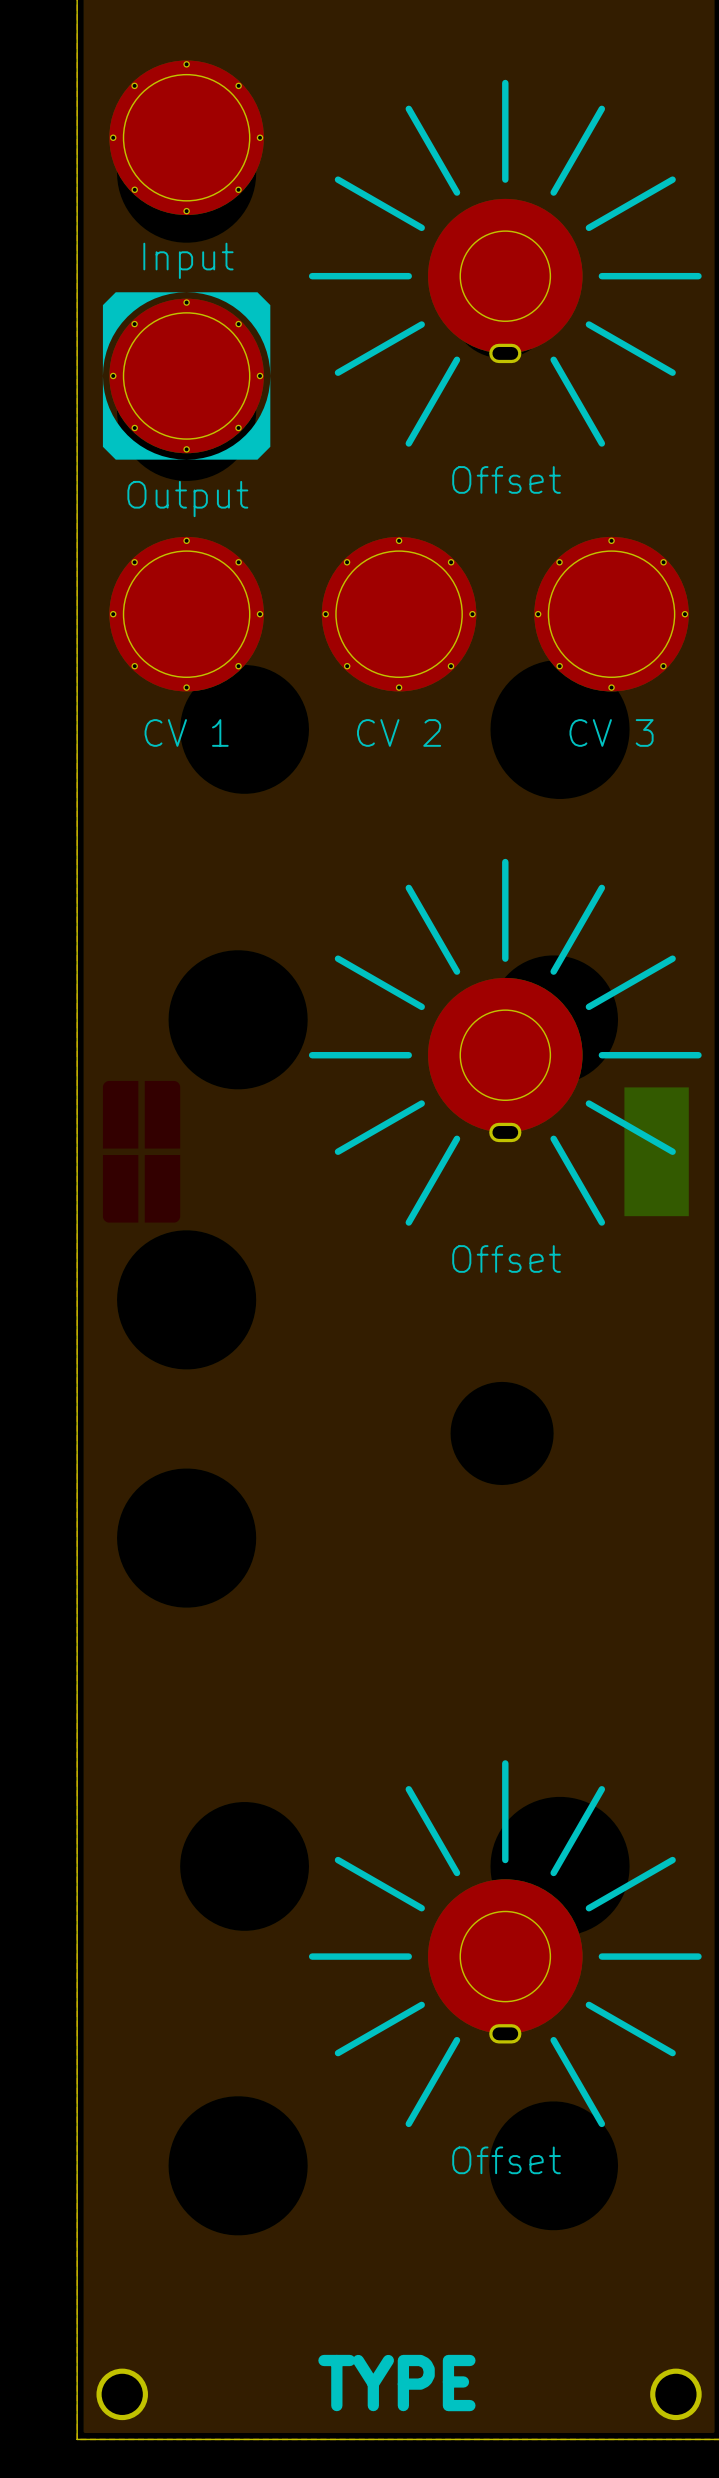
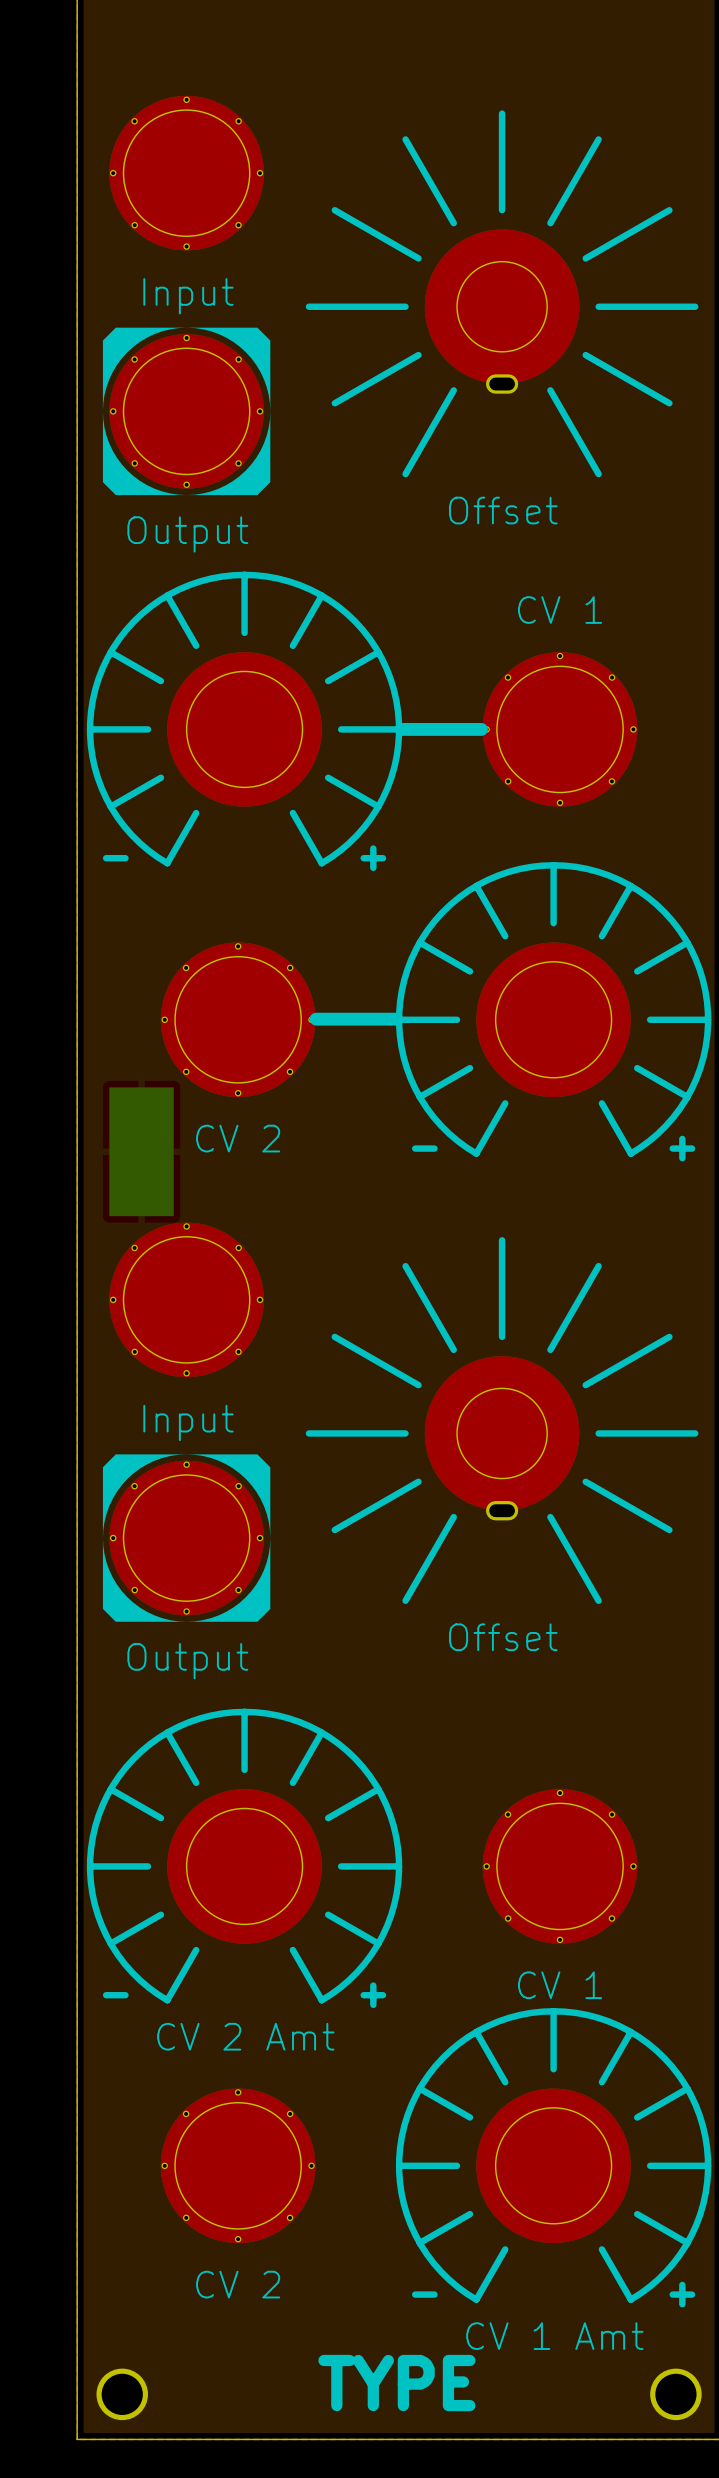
part position: (186, 137) -> (186, 173)
part position: (505, 263) -> (502, 293)
part position: (186, 375) -> (186, 411)
part: CV 1 (186, 614) -> none
part: CV 2 (399, 614) -> none
part: CV 3 (611, 614) -> none
part: none -> (244, 721)
line: none -> (402, 729) (481, 729)
part: none -> CV 1 (560, 729)
part: none -> (553, 1011)
part: none -> CV 2 (238, 1019)
line: none -> (316, 1019) (395, 1019)
part: Offset (505, 1042) -> none
part: none -> (141, 1151)
part: (656, 1151) -> none
part: none -> Input (186, 1299)
part: none -> Offset (502, 1420)
part: none -> Output (186, 1538)
part: none -> CV 2 Amt (244, 1858)
part: none -> CV 1 (560, 1866)
part: Offset (505, 1943) -> none
part: none -> CV 1 Amt (553, 2157)
part: none -> CV 2 (238, 2165)

